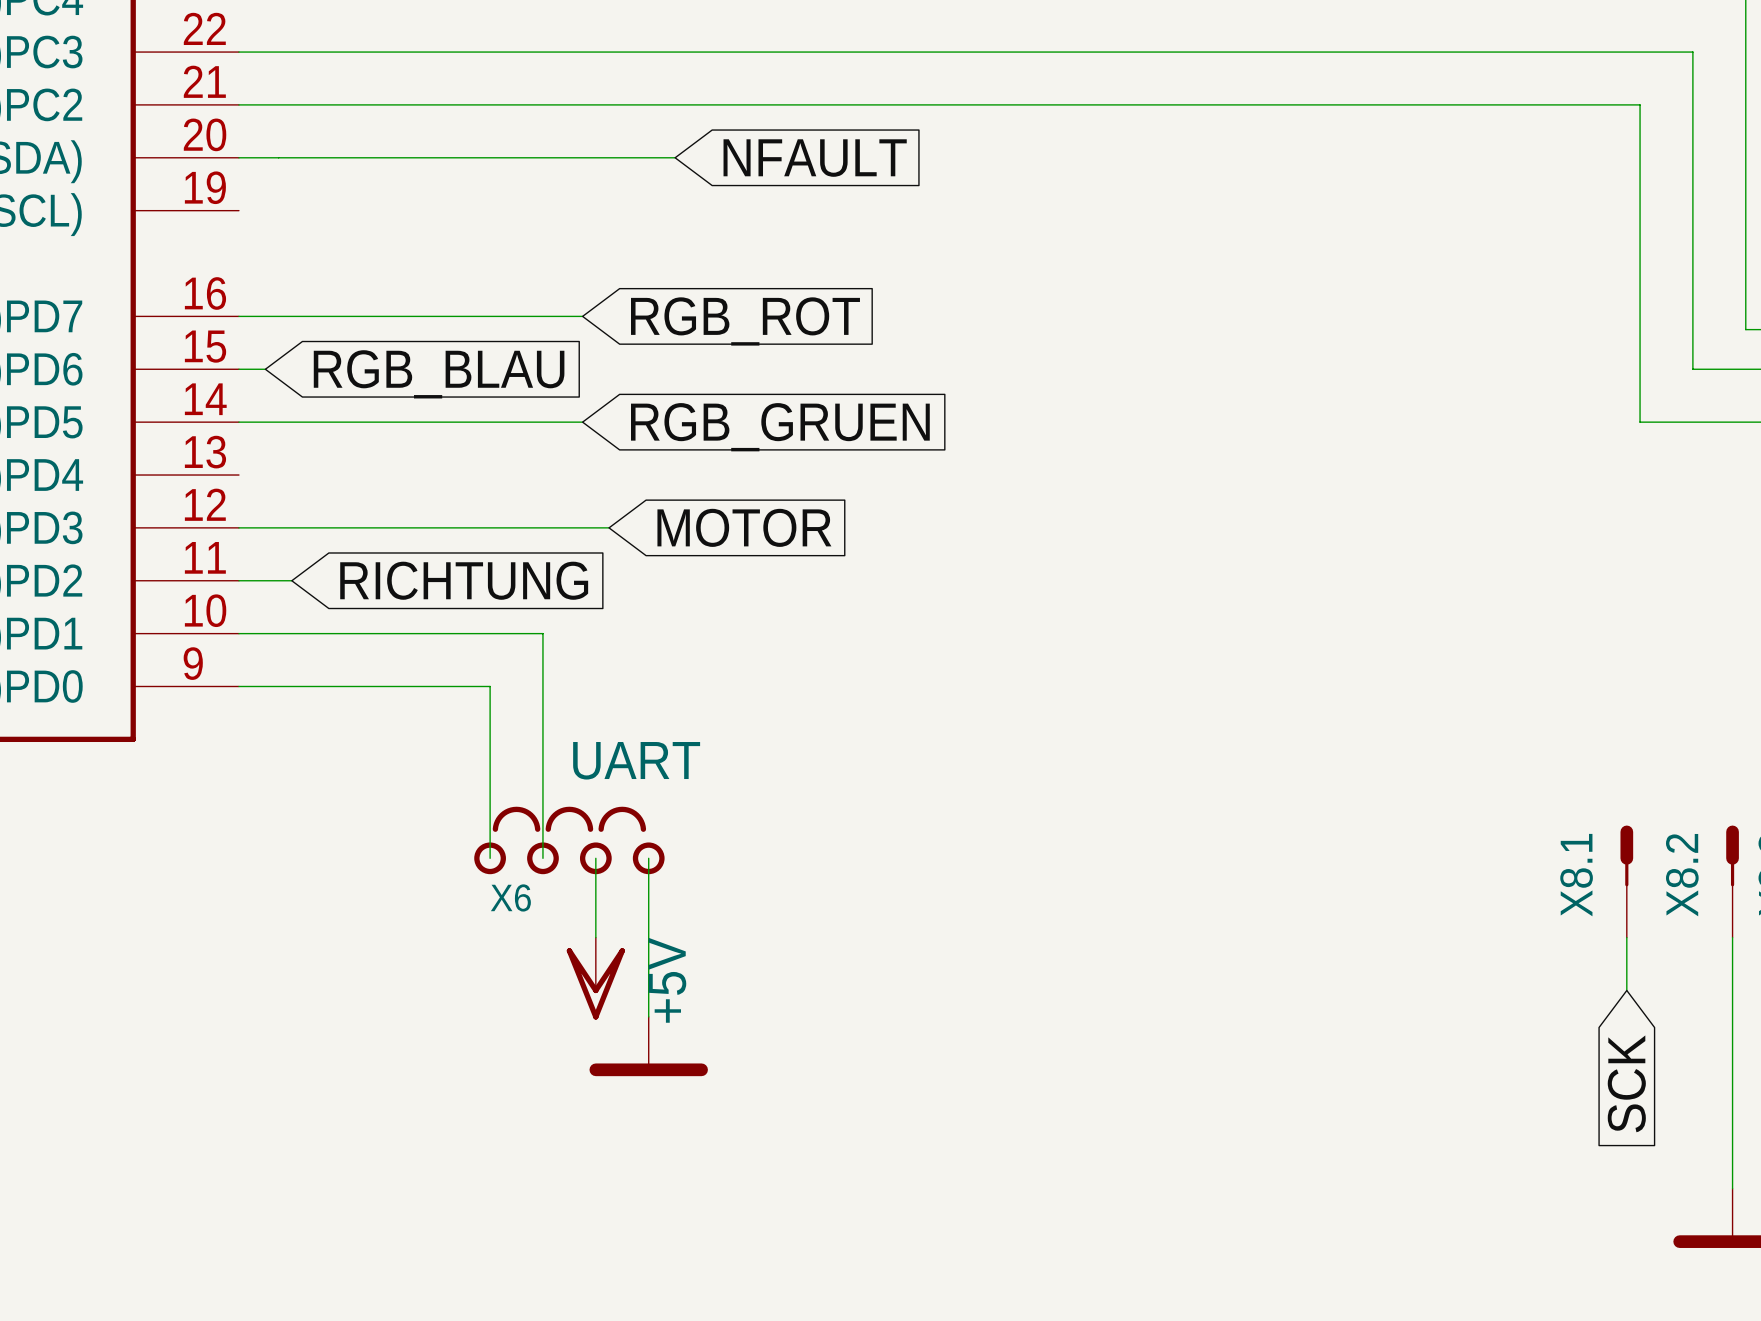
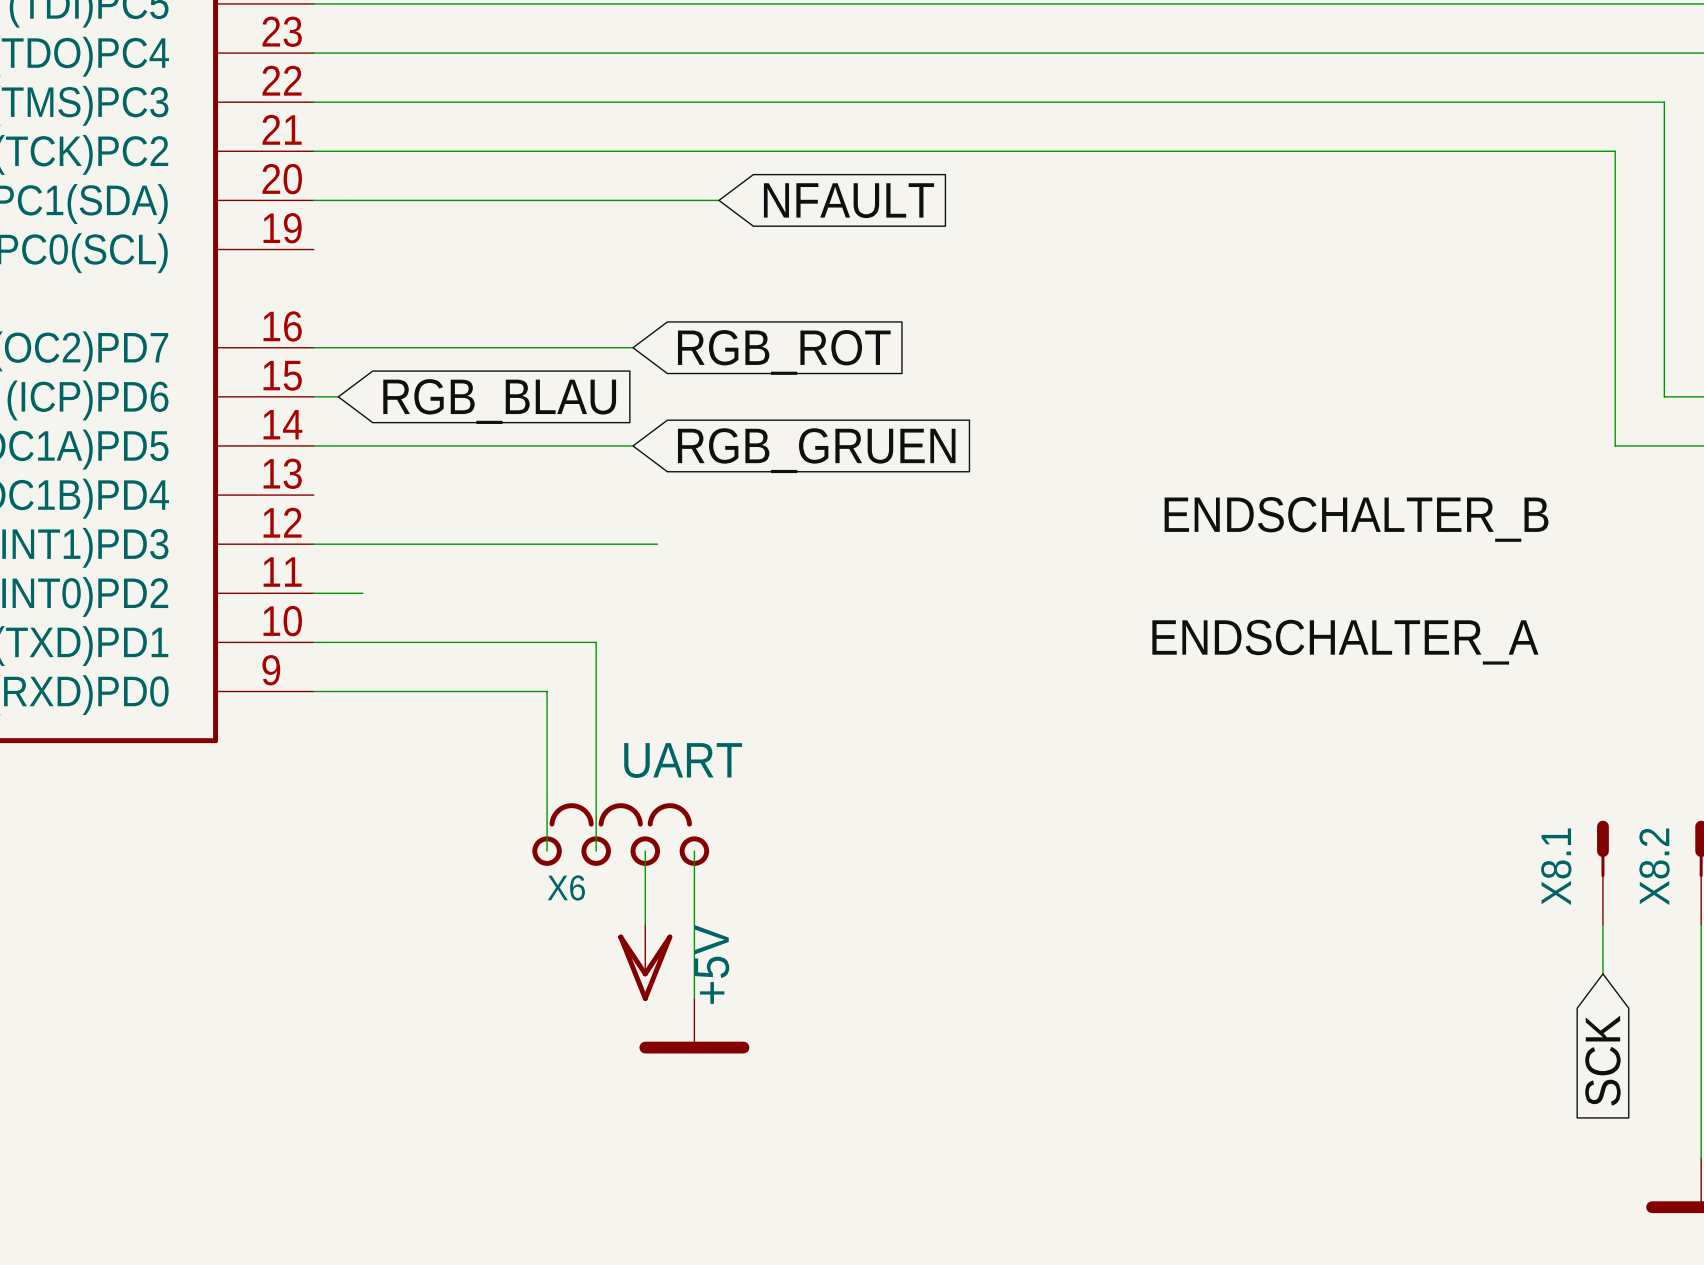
label: none -> ENDSCHALTER_B (1356, 519)
global label: MOTOR (744, 527) -> none
global label: RICHTUNG (464, 580) -> none
label: none -> ENDSCHALTER_A (1345, 642)

